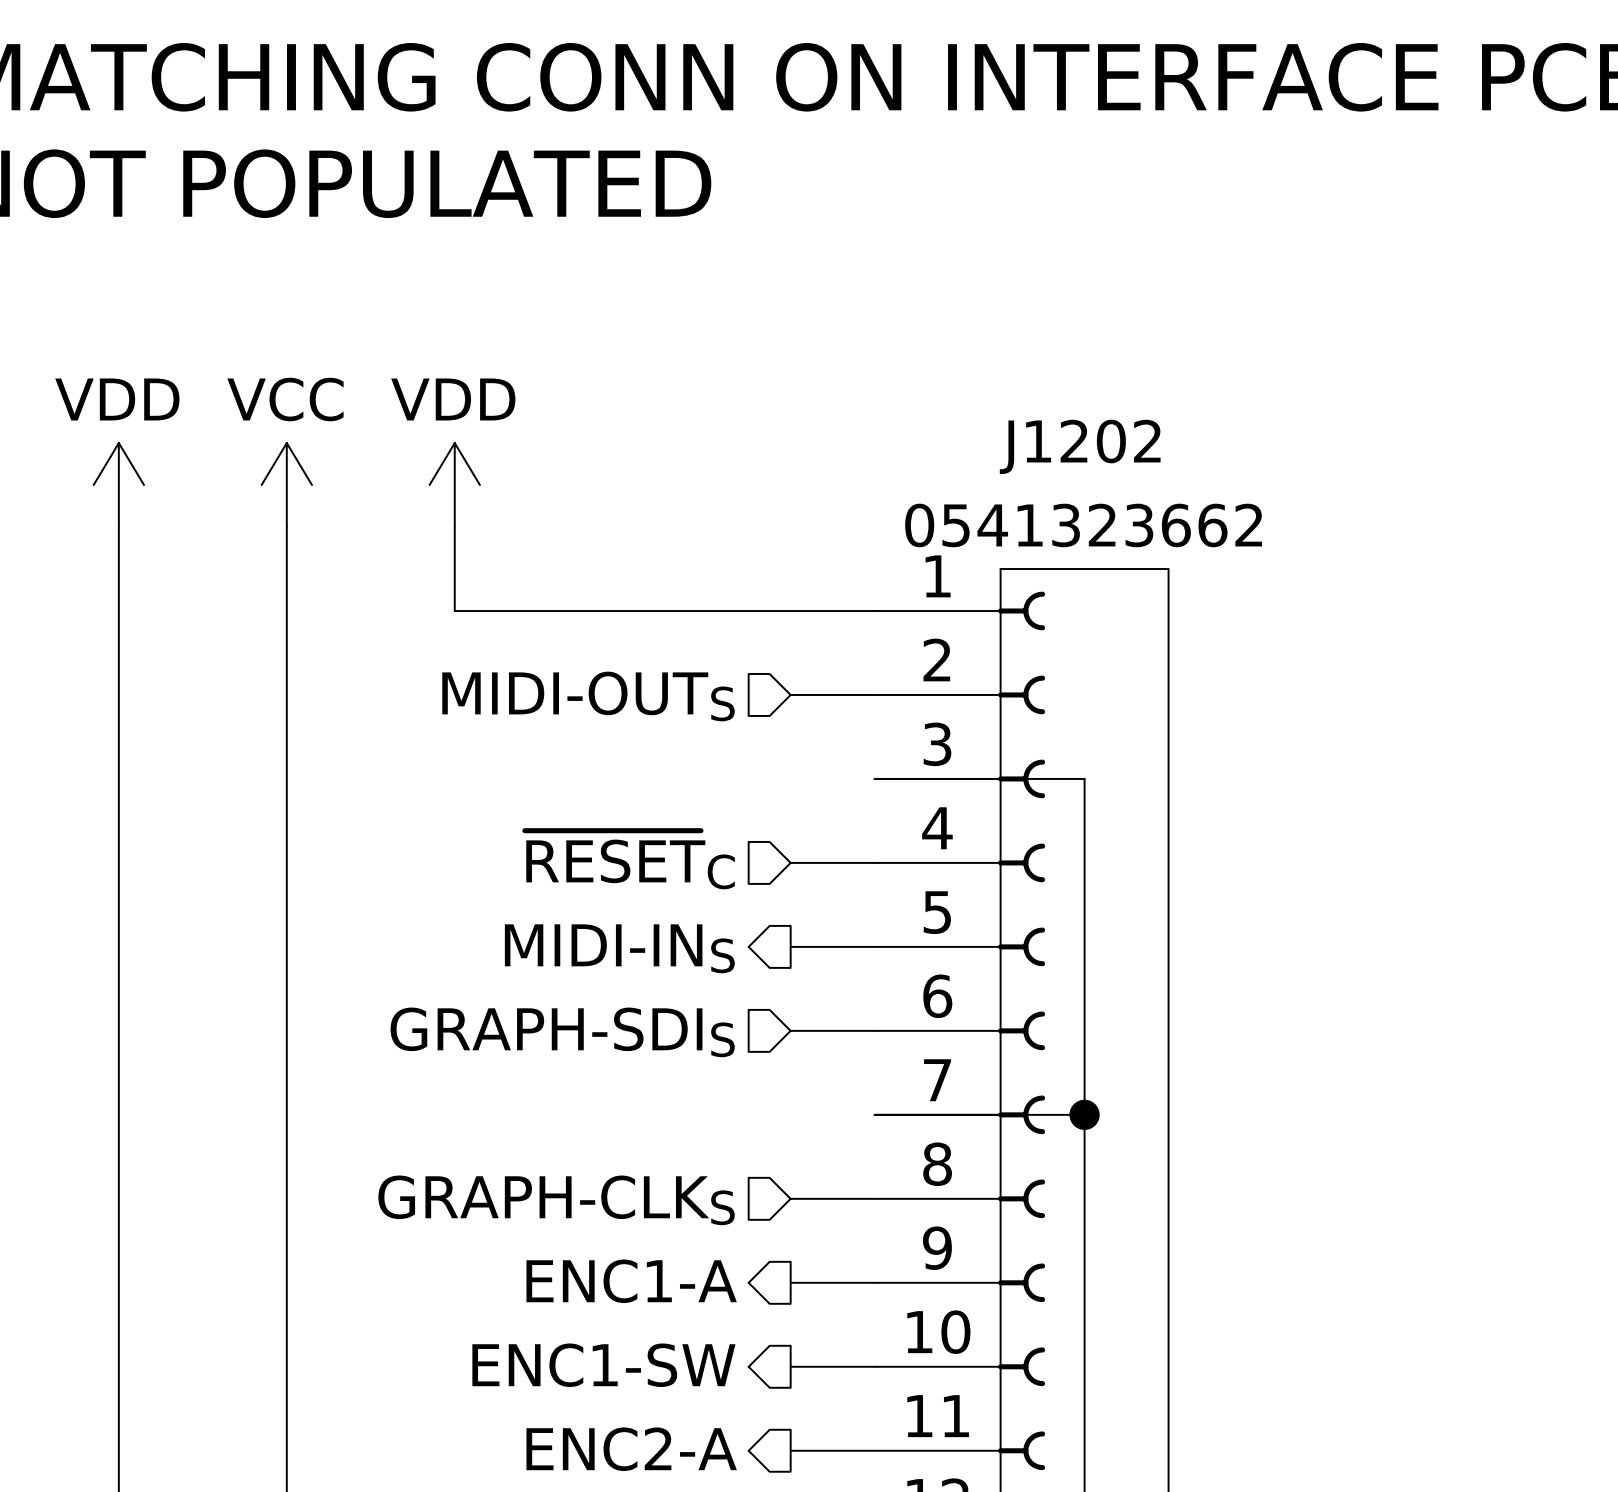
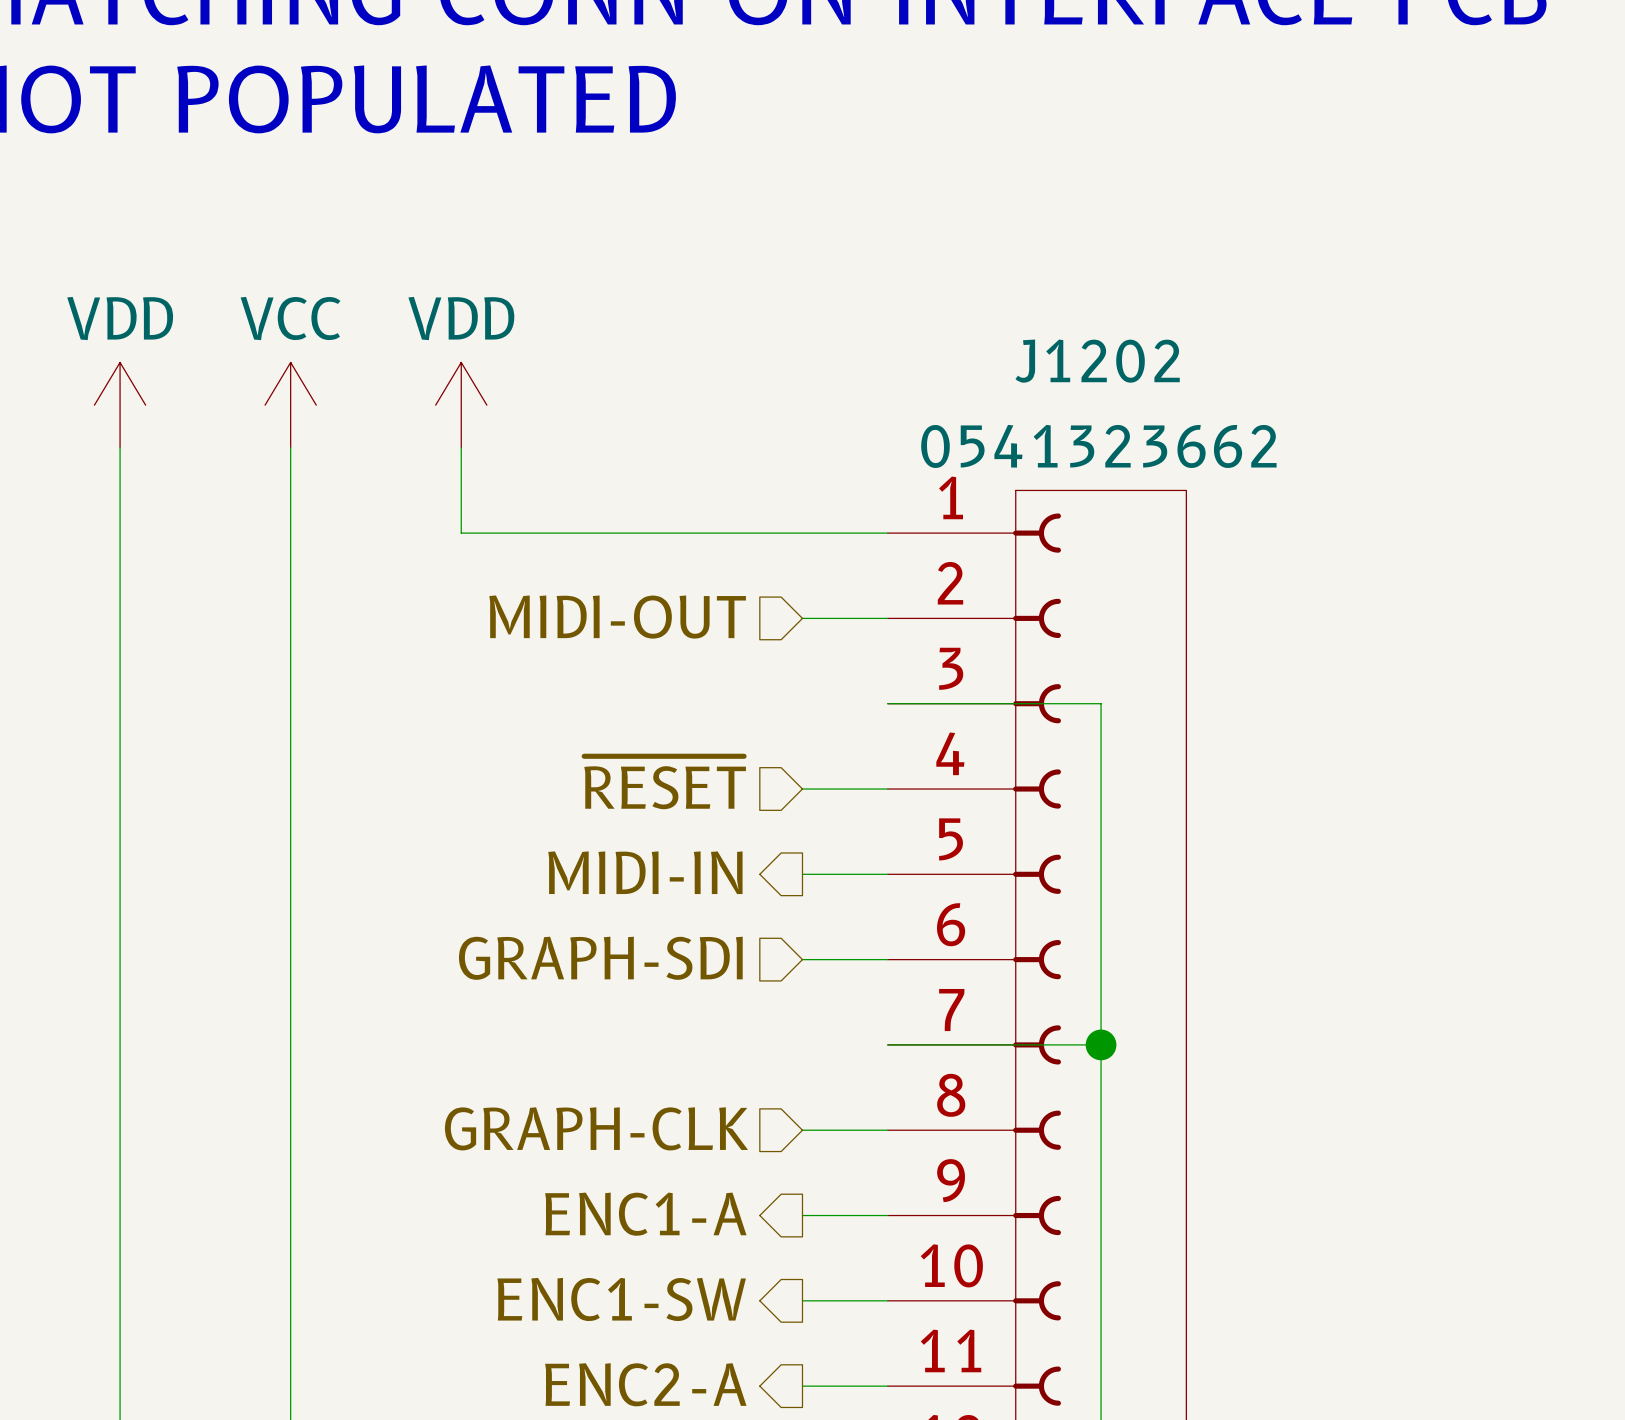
hierarchical label: MIDI-OUTS (588, 696) -> MIDI-OUT (617, 617)
hierarchical label: ~{RESET}C (629, 860) -> ~{RESET} (665, 782)
hierarchical label: MIDI-INS (619, 948) -> MIDI-IN (645, 872)
hierarchical label: GRAPH-SDIS (562, 1032) -> GRAPH-SDI (600, 958)
hierarchical label: GRAPH-CLKS (556, 1200) -> GRAPH-CLK (596, 1128)

